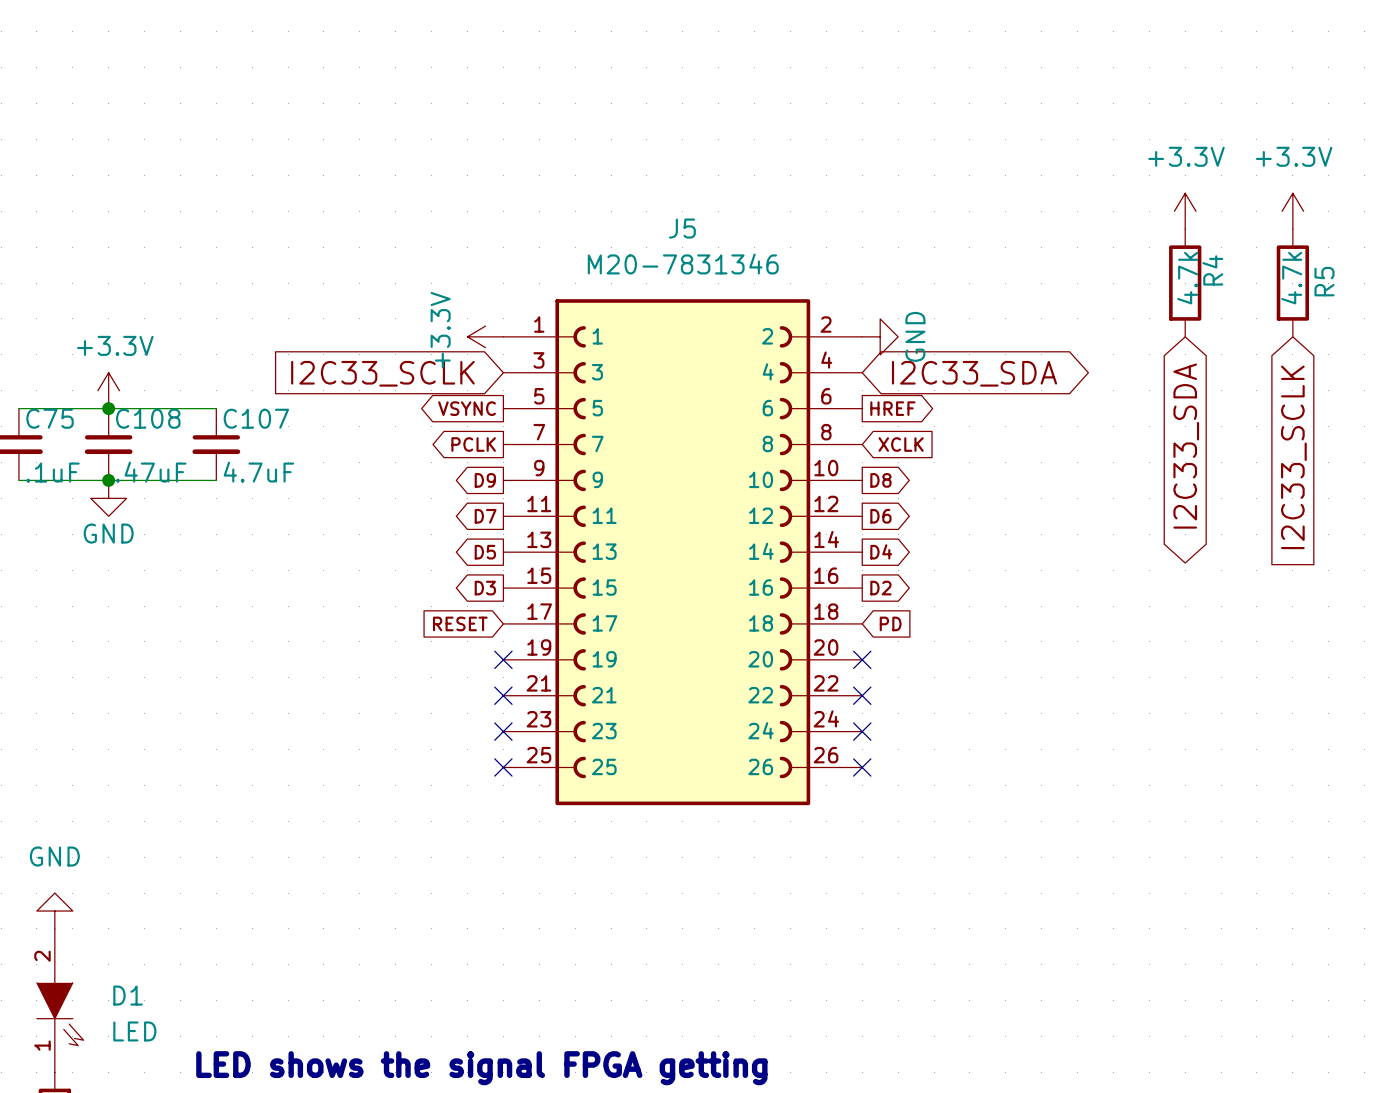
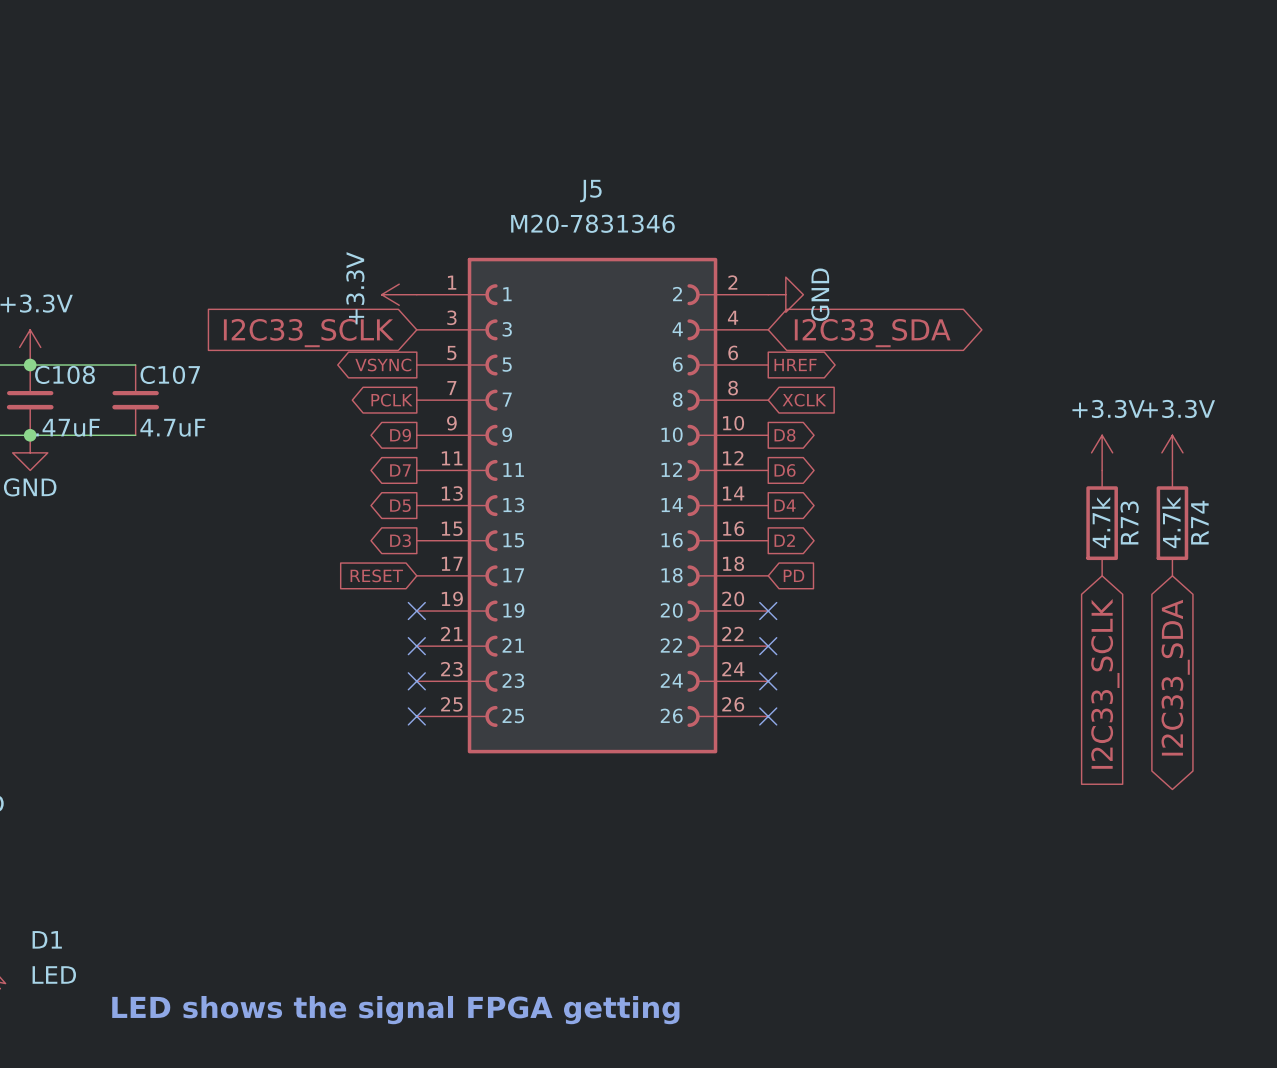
power symbol: +3.3V (1185, 211) -> none
power symbol: +3.3V (1292, 211) -> none
R4: 4.7k (1185, 283) -> none
R5: 4.7k (1292, 283) -> none
global label position: I2C33_SDA (1186, 446) -> I2C33_SDA (1175, 677)
global label position: I2C33_SCLK (1293, 457) -> I2C33_SCLK (1105, 683)
power symbol: none -> +3.3V (1102, 452)
power symbol: none -> +3.3V (1172, 452)
R73: none -> 4.7k (1102, 523)
R74: none -> 4.7k (1172, 523)

